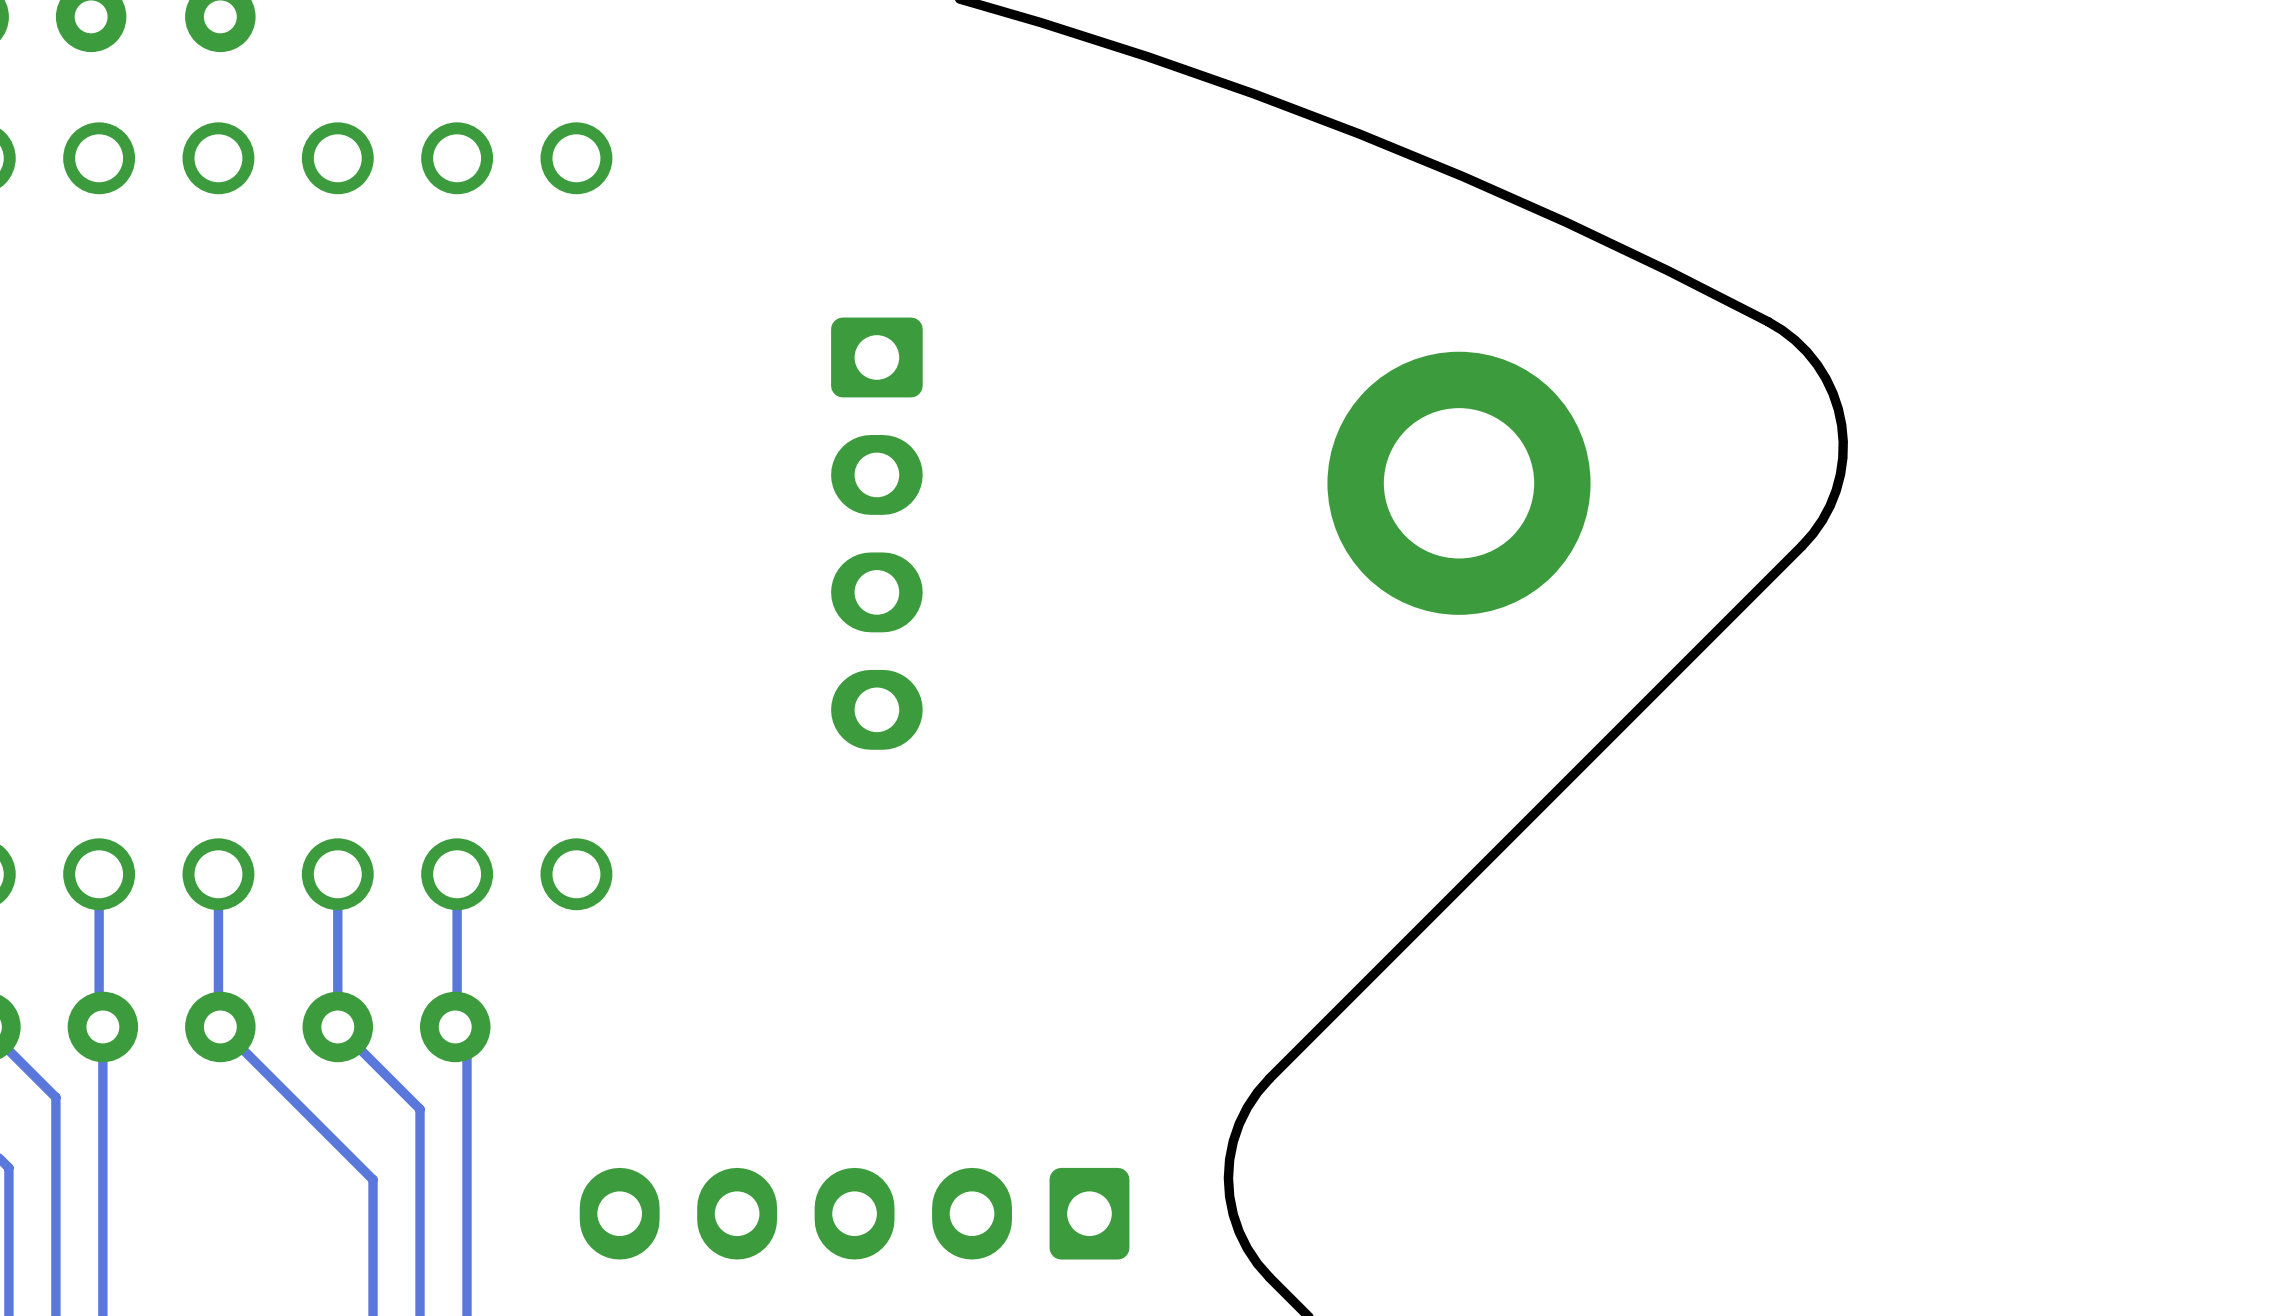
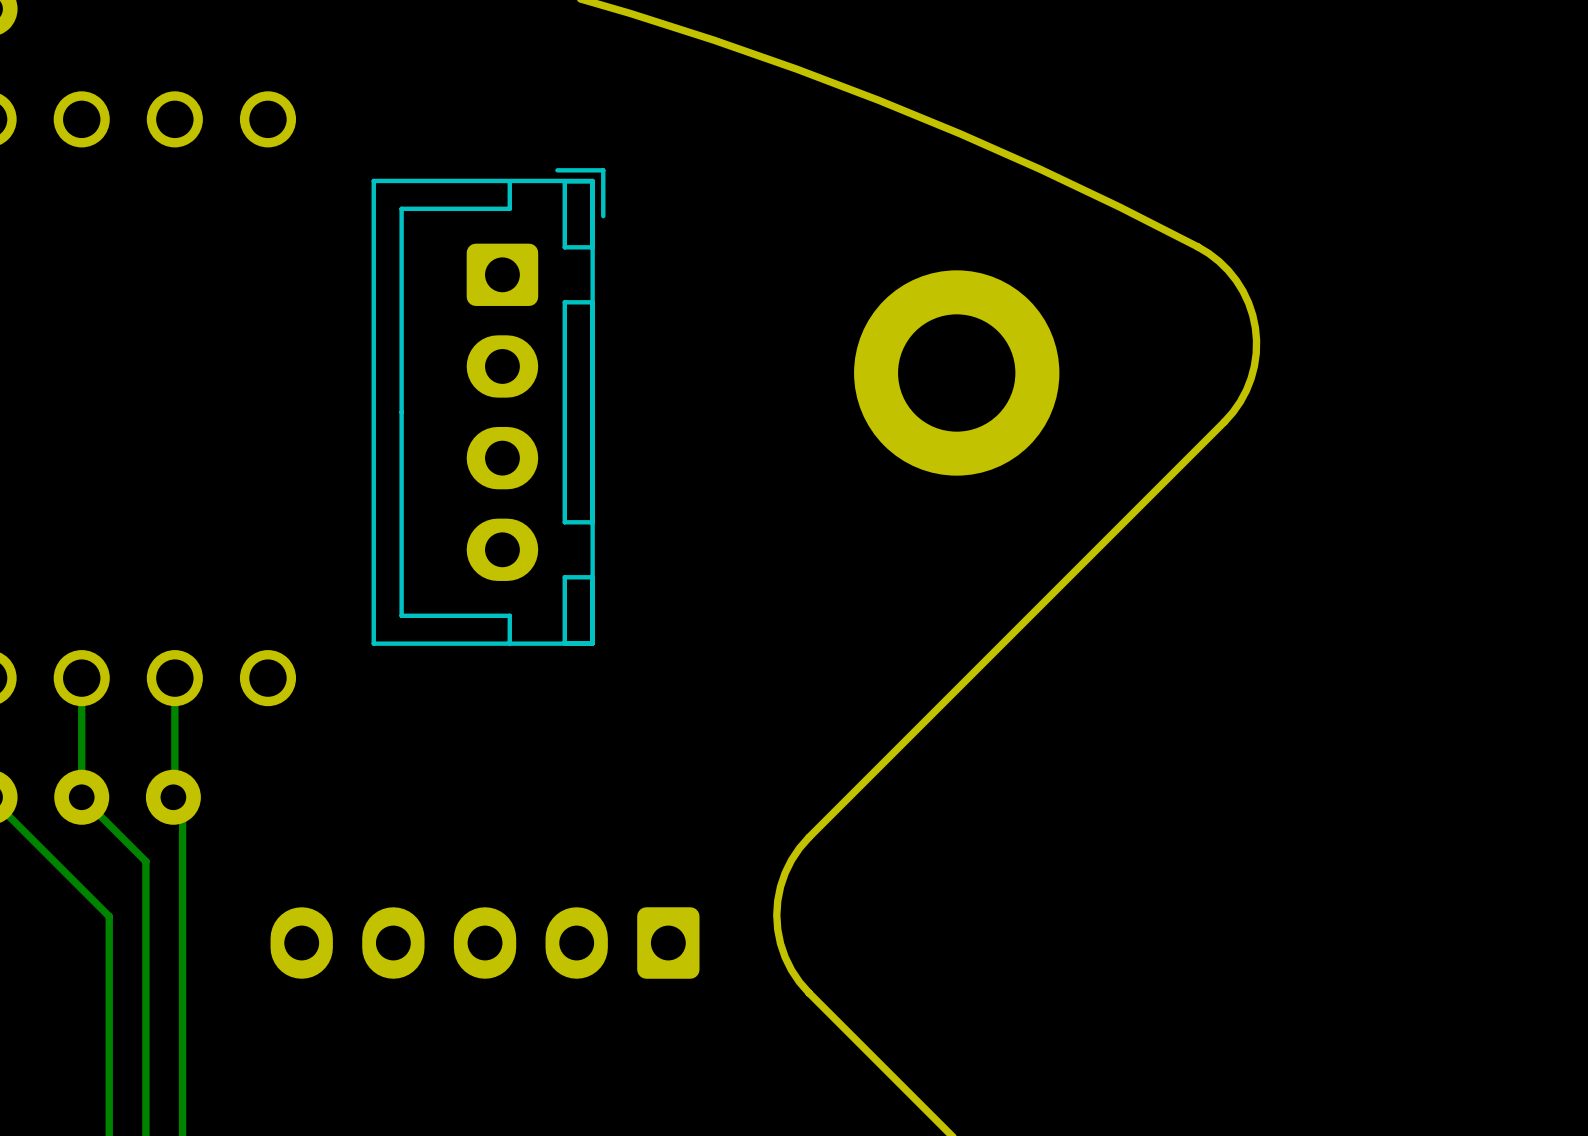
part side: top (876, 533) -> bottom (488, 406)

